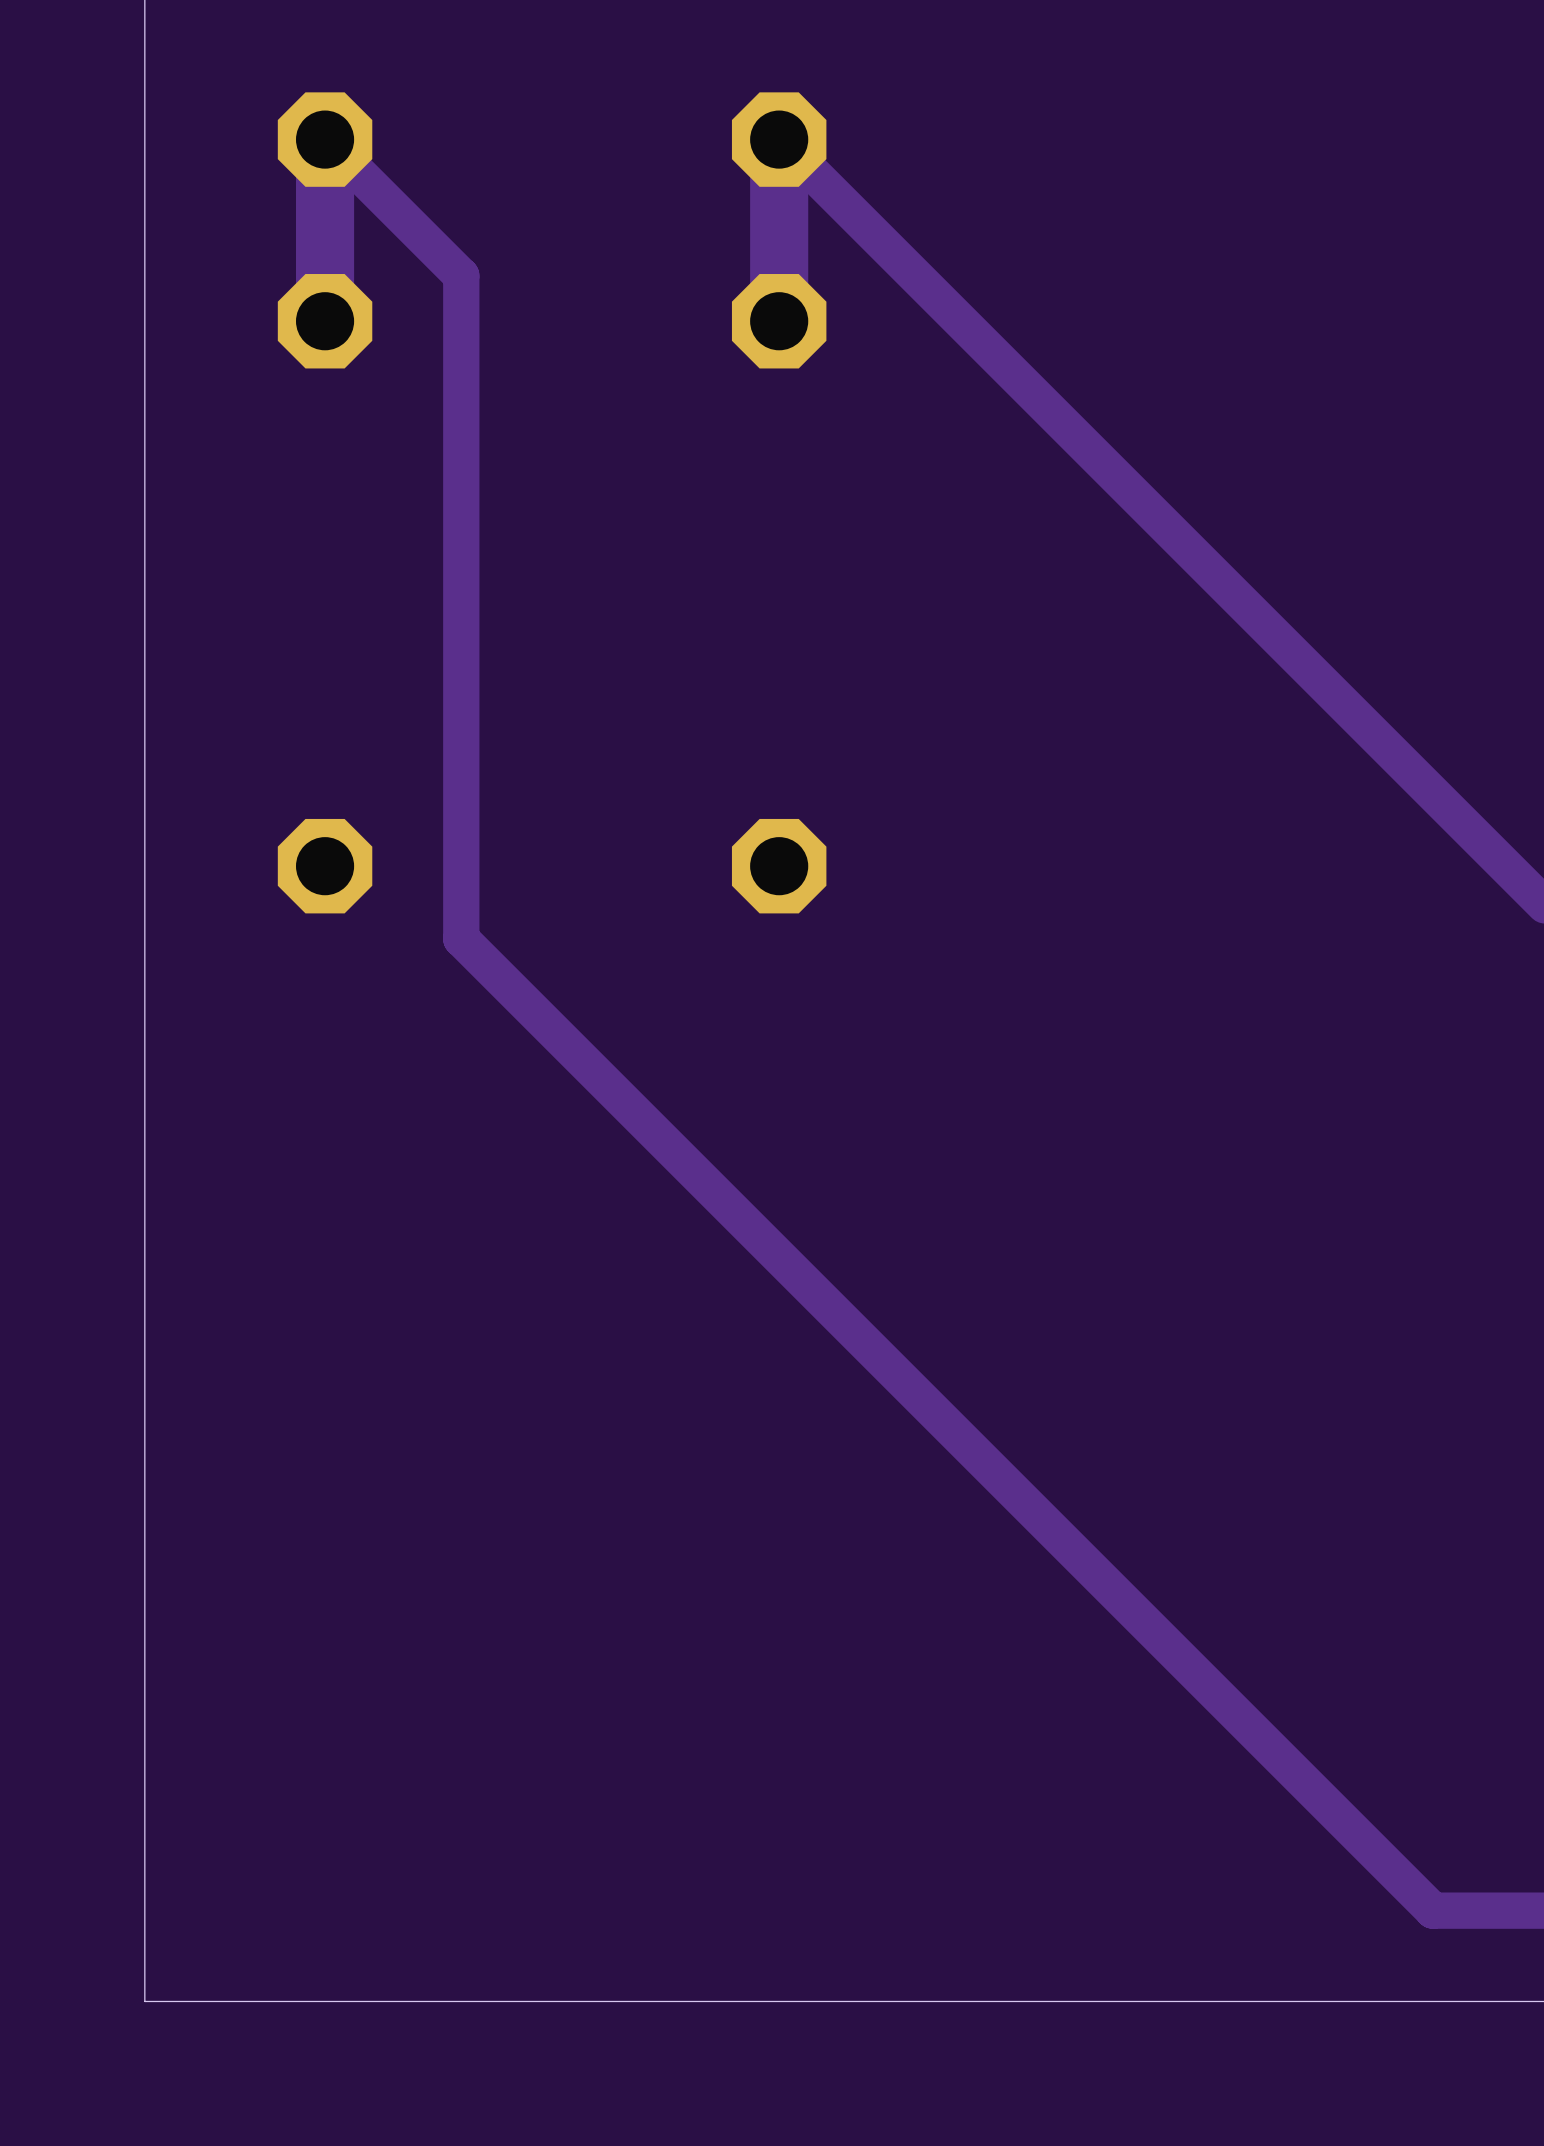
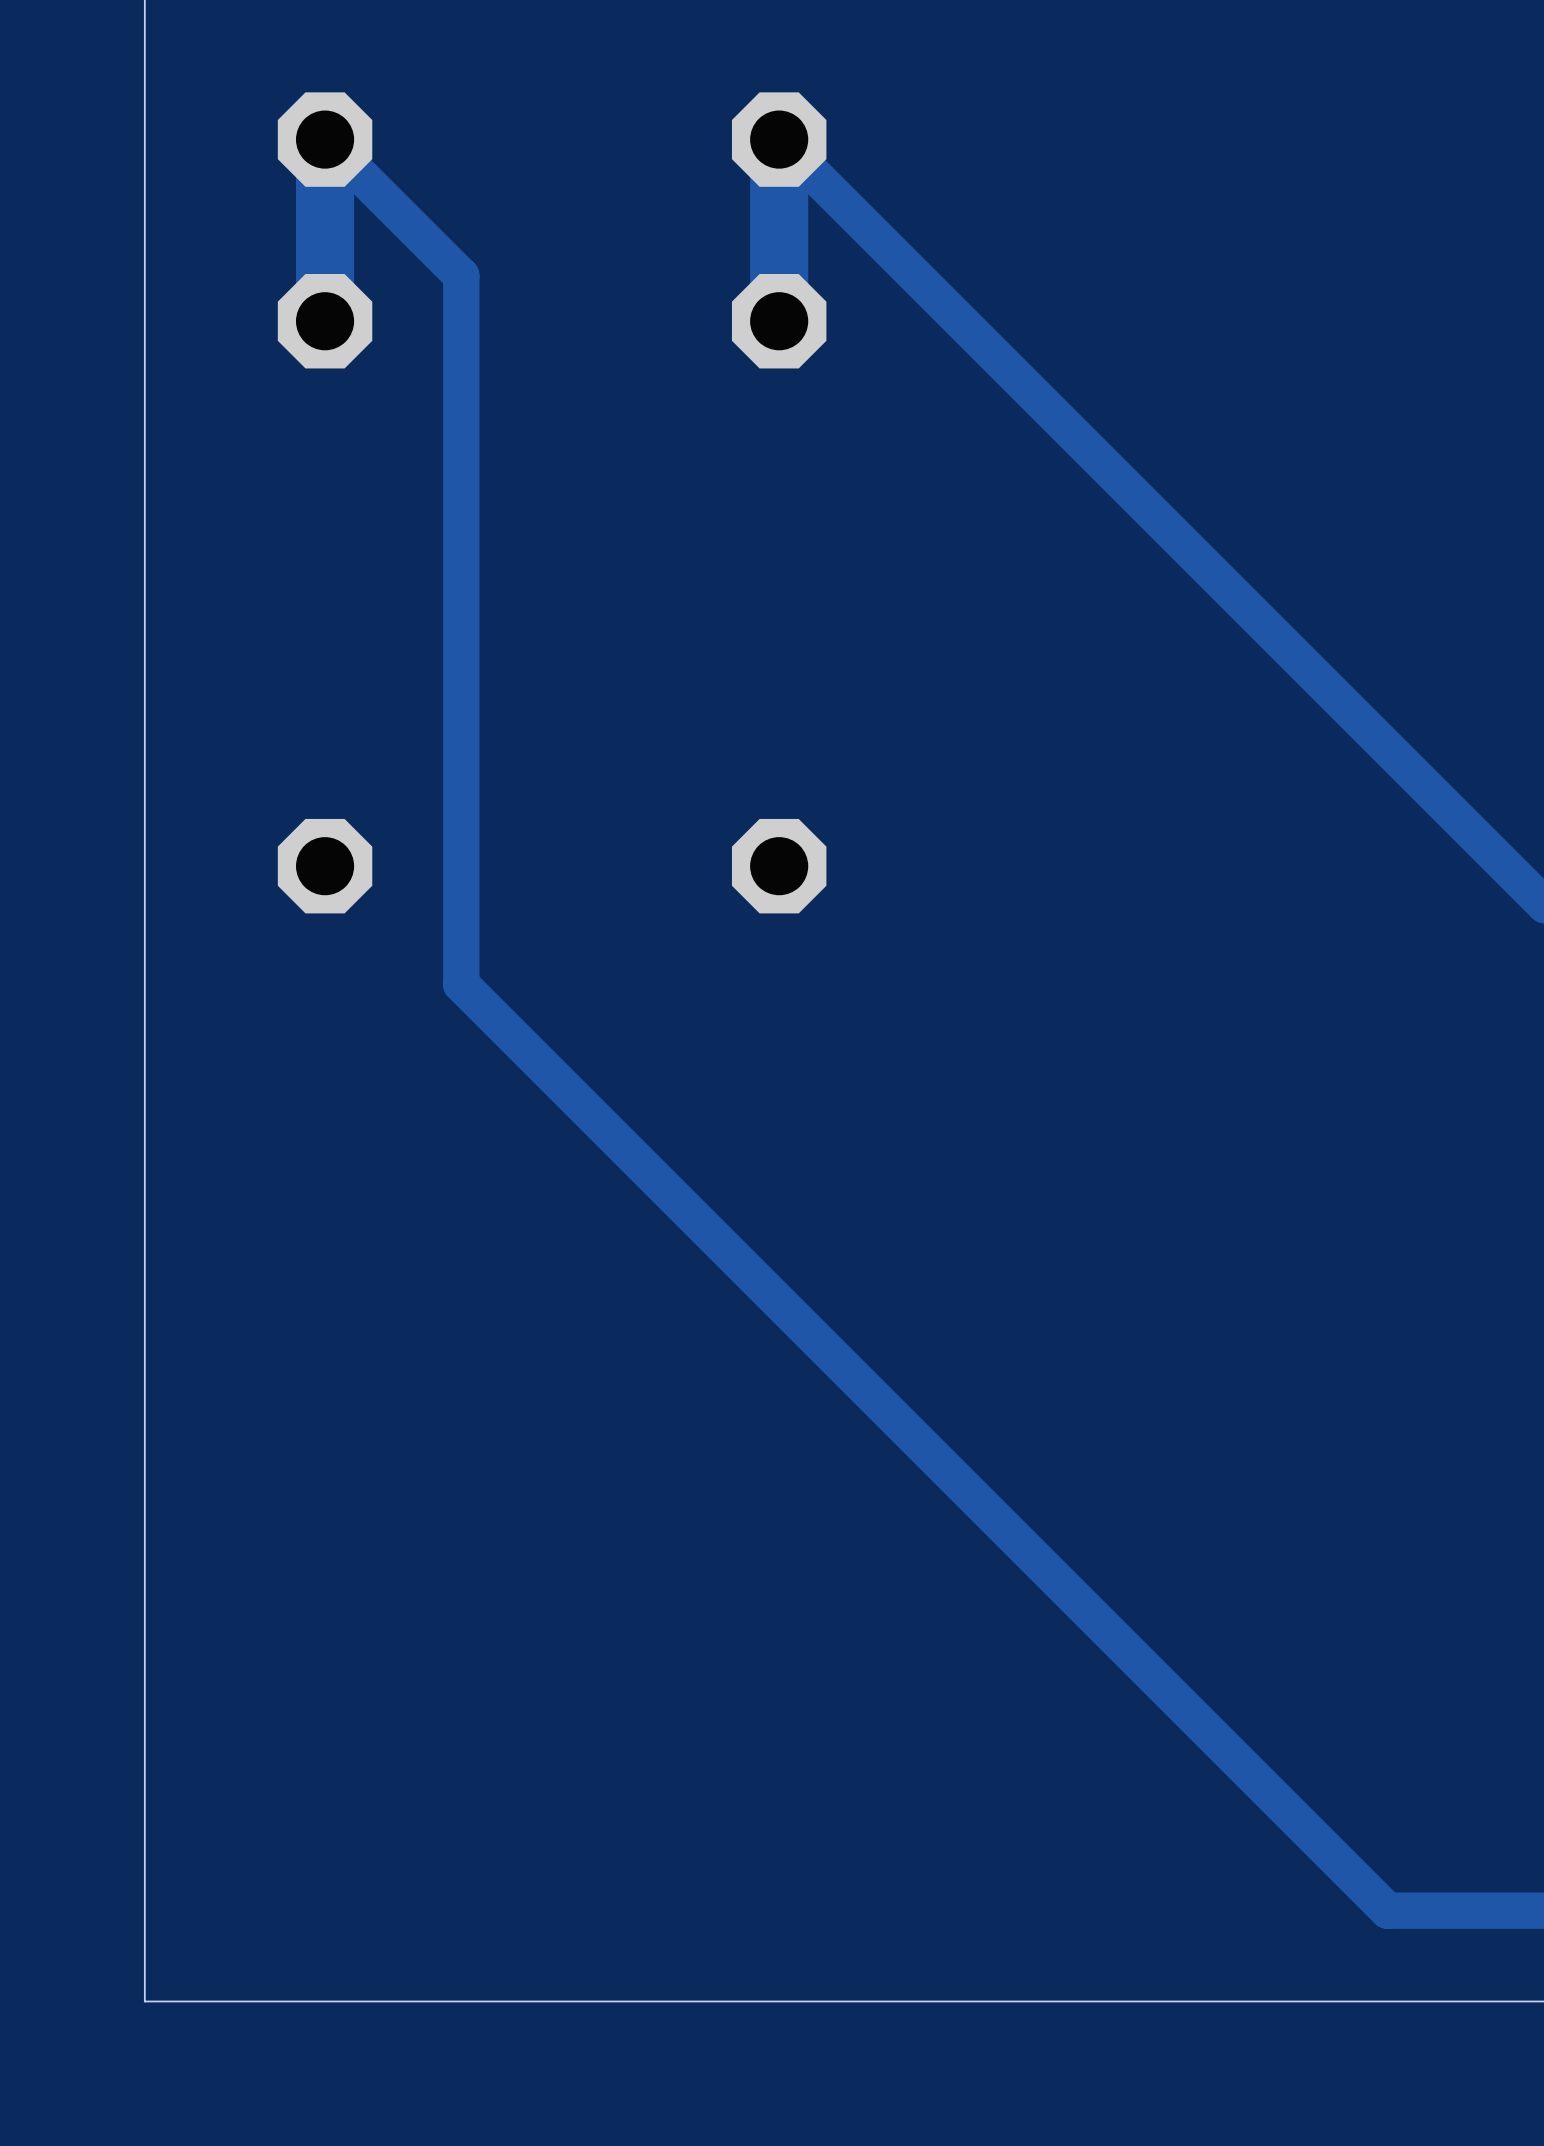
track: (461, 938) (1433, 1910) -> (461, 938) (461, 984) (1387, 1910) (1433, 1910)

